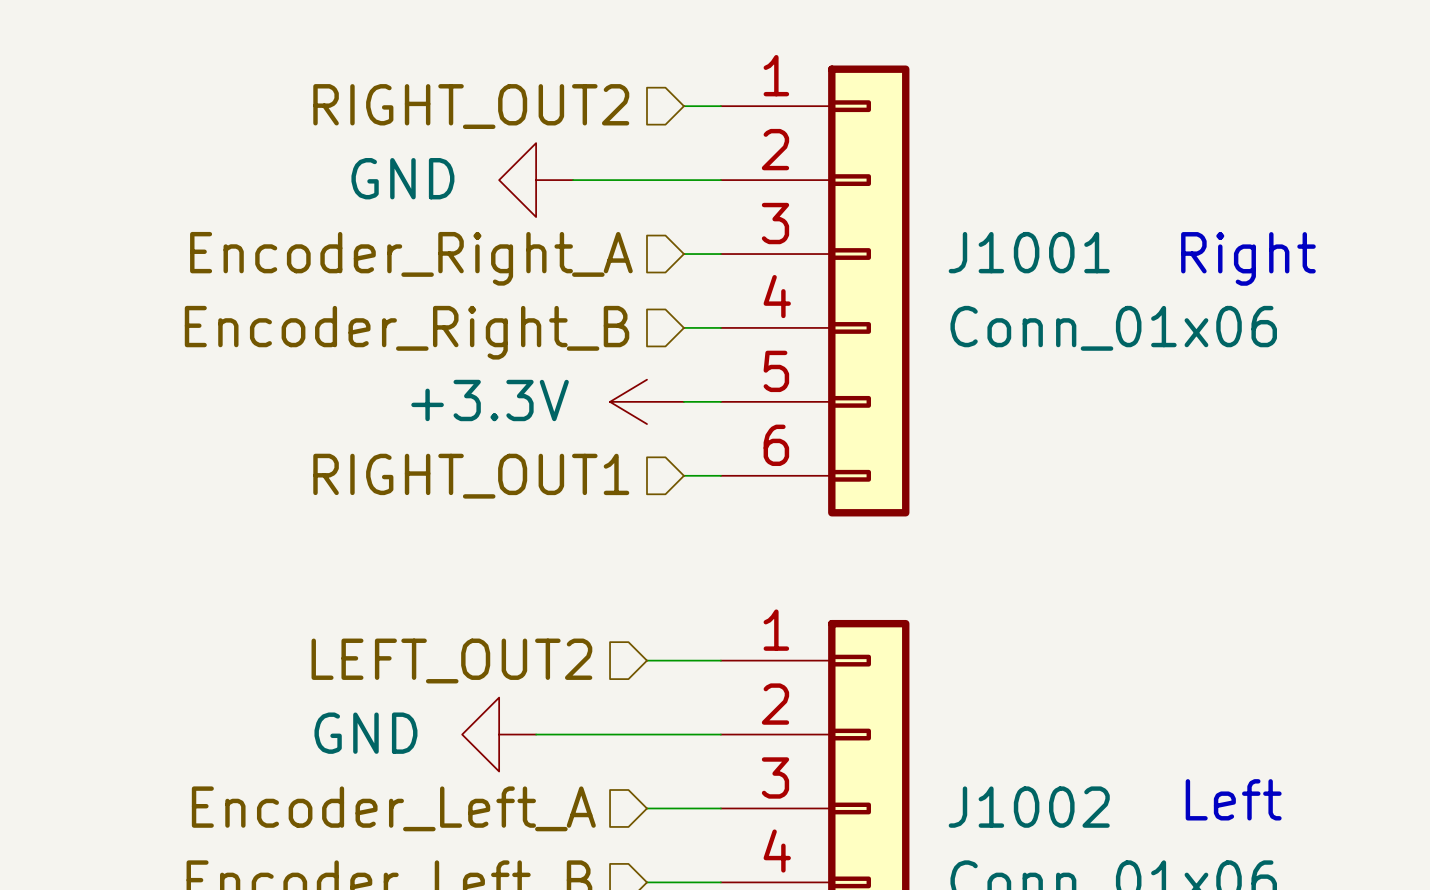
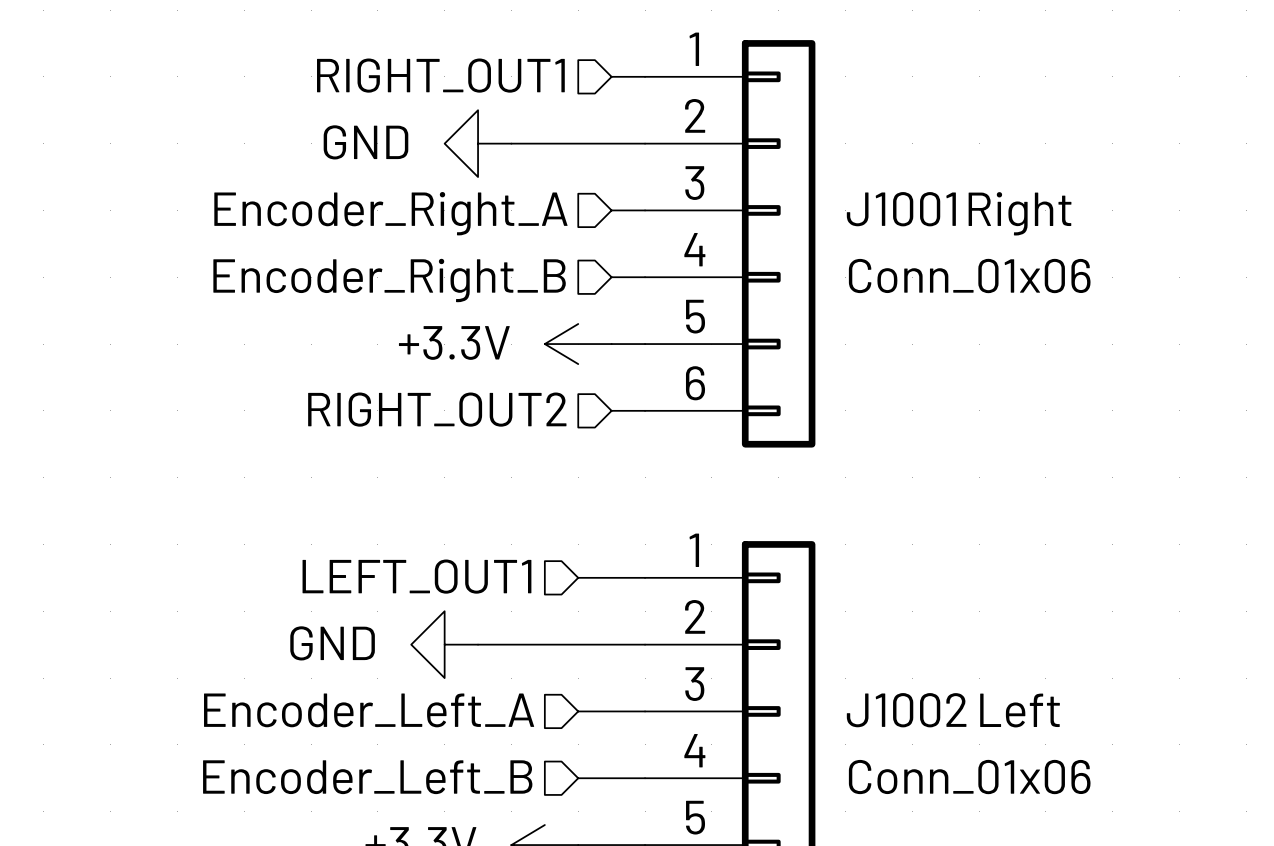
hierarchical label: RIGHT_OUT2 (471, 106) -> RIGHT_OUT1 (440, 75)
text position: Right (1248, 258) -> Right (1020, 213)
hierarchical label: RIGHT_OUT1 (471, 476) -> RIGHT_OUT2 (437, 409)
hierarchical label: LEFT_OUT2 (451, 661) -> LEFT_OUT1 (416, 576)
text position: Left (1233, 799) -> Left (1020, 710)

